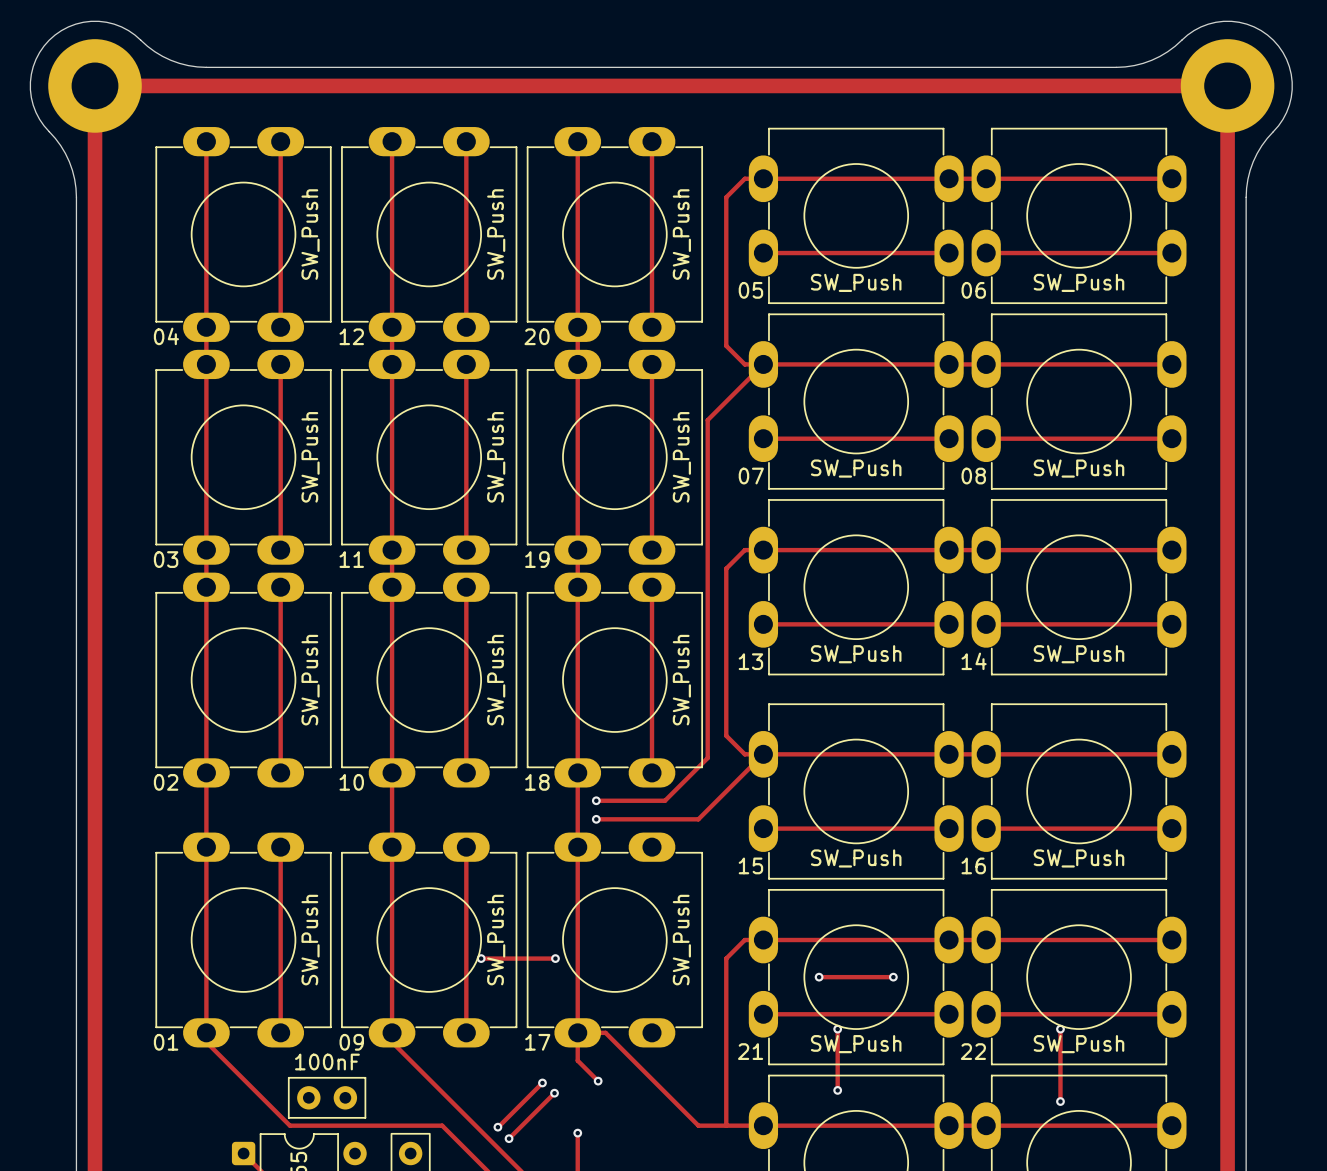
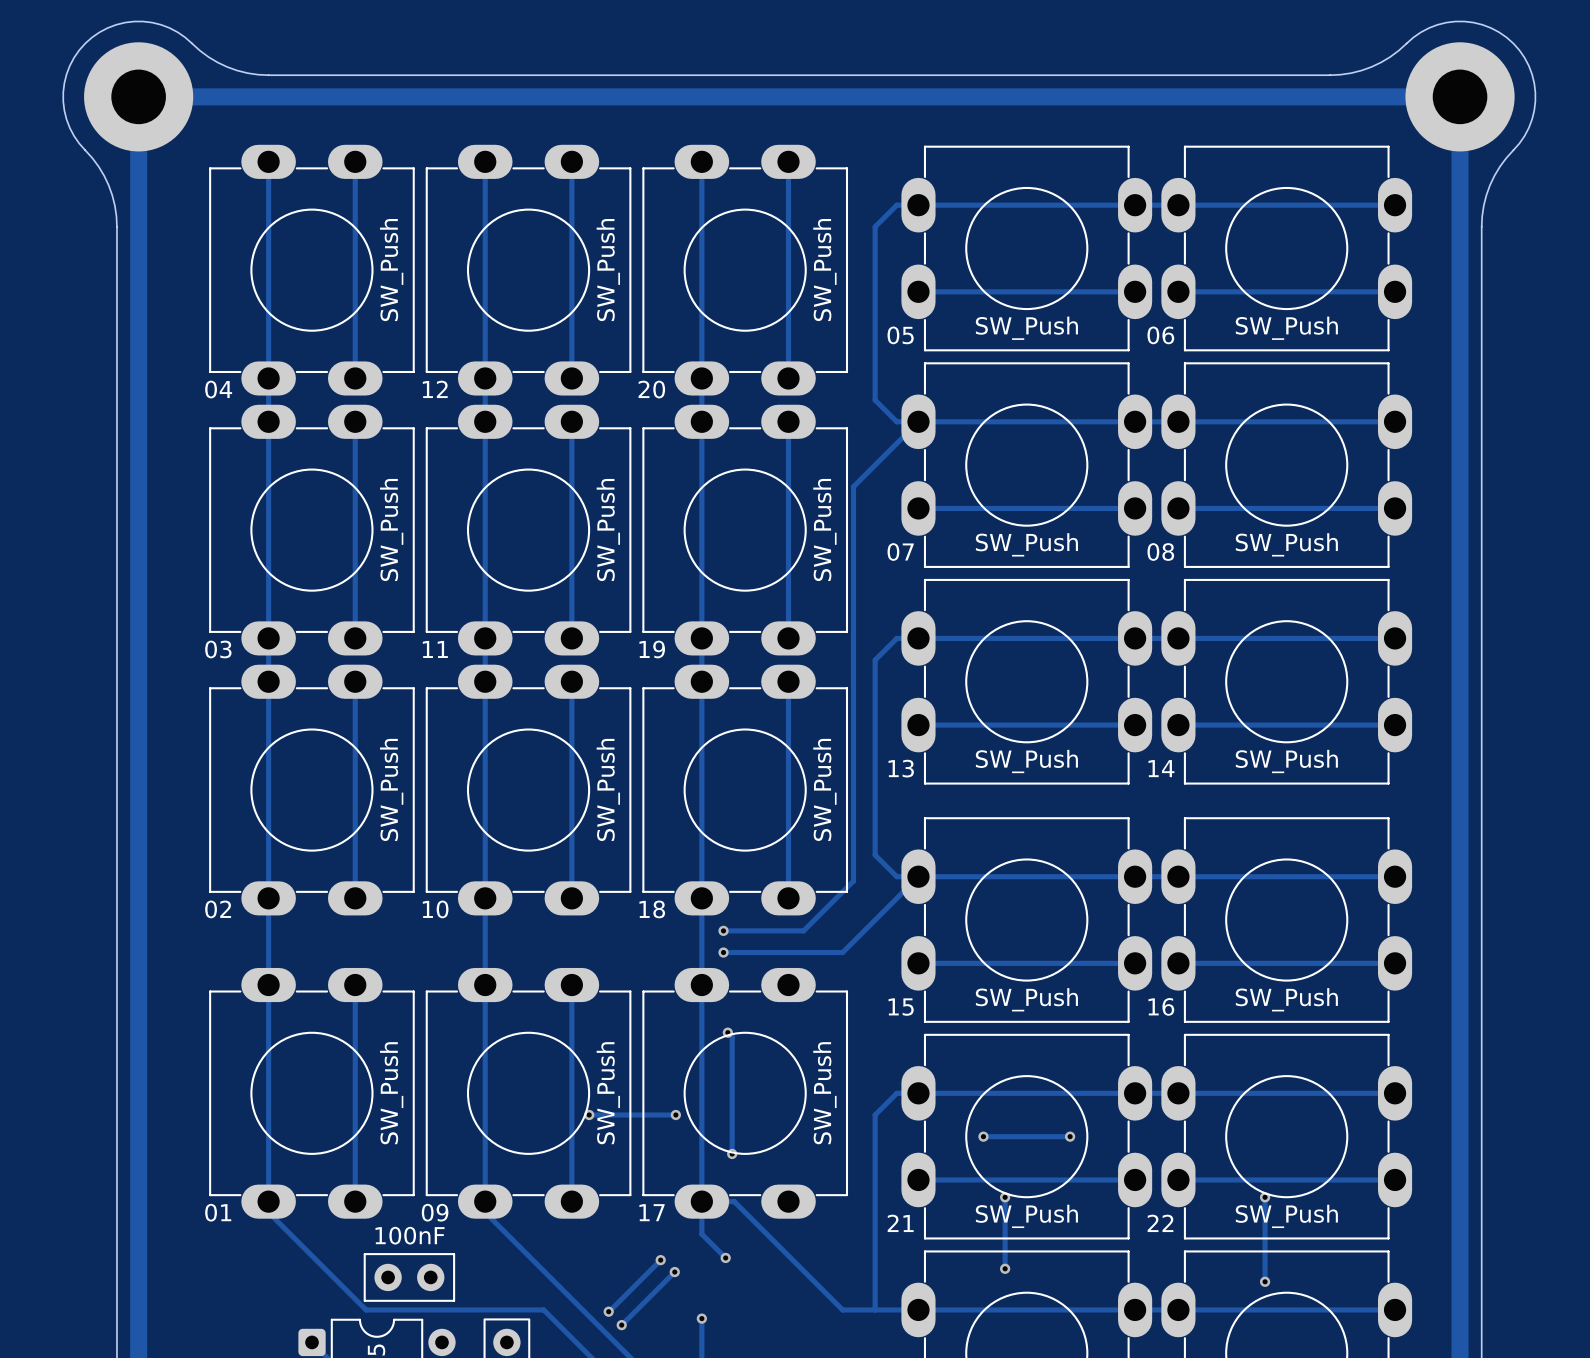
track: none -> (727, 1032) (732, 1037) (732, 1153)
via: none -> (727, 1032)
via: none -> (732, 1153)

